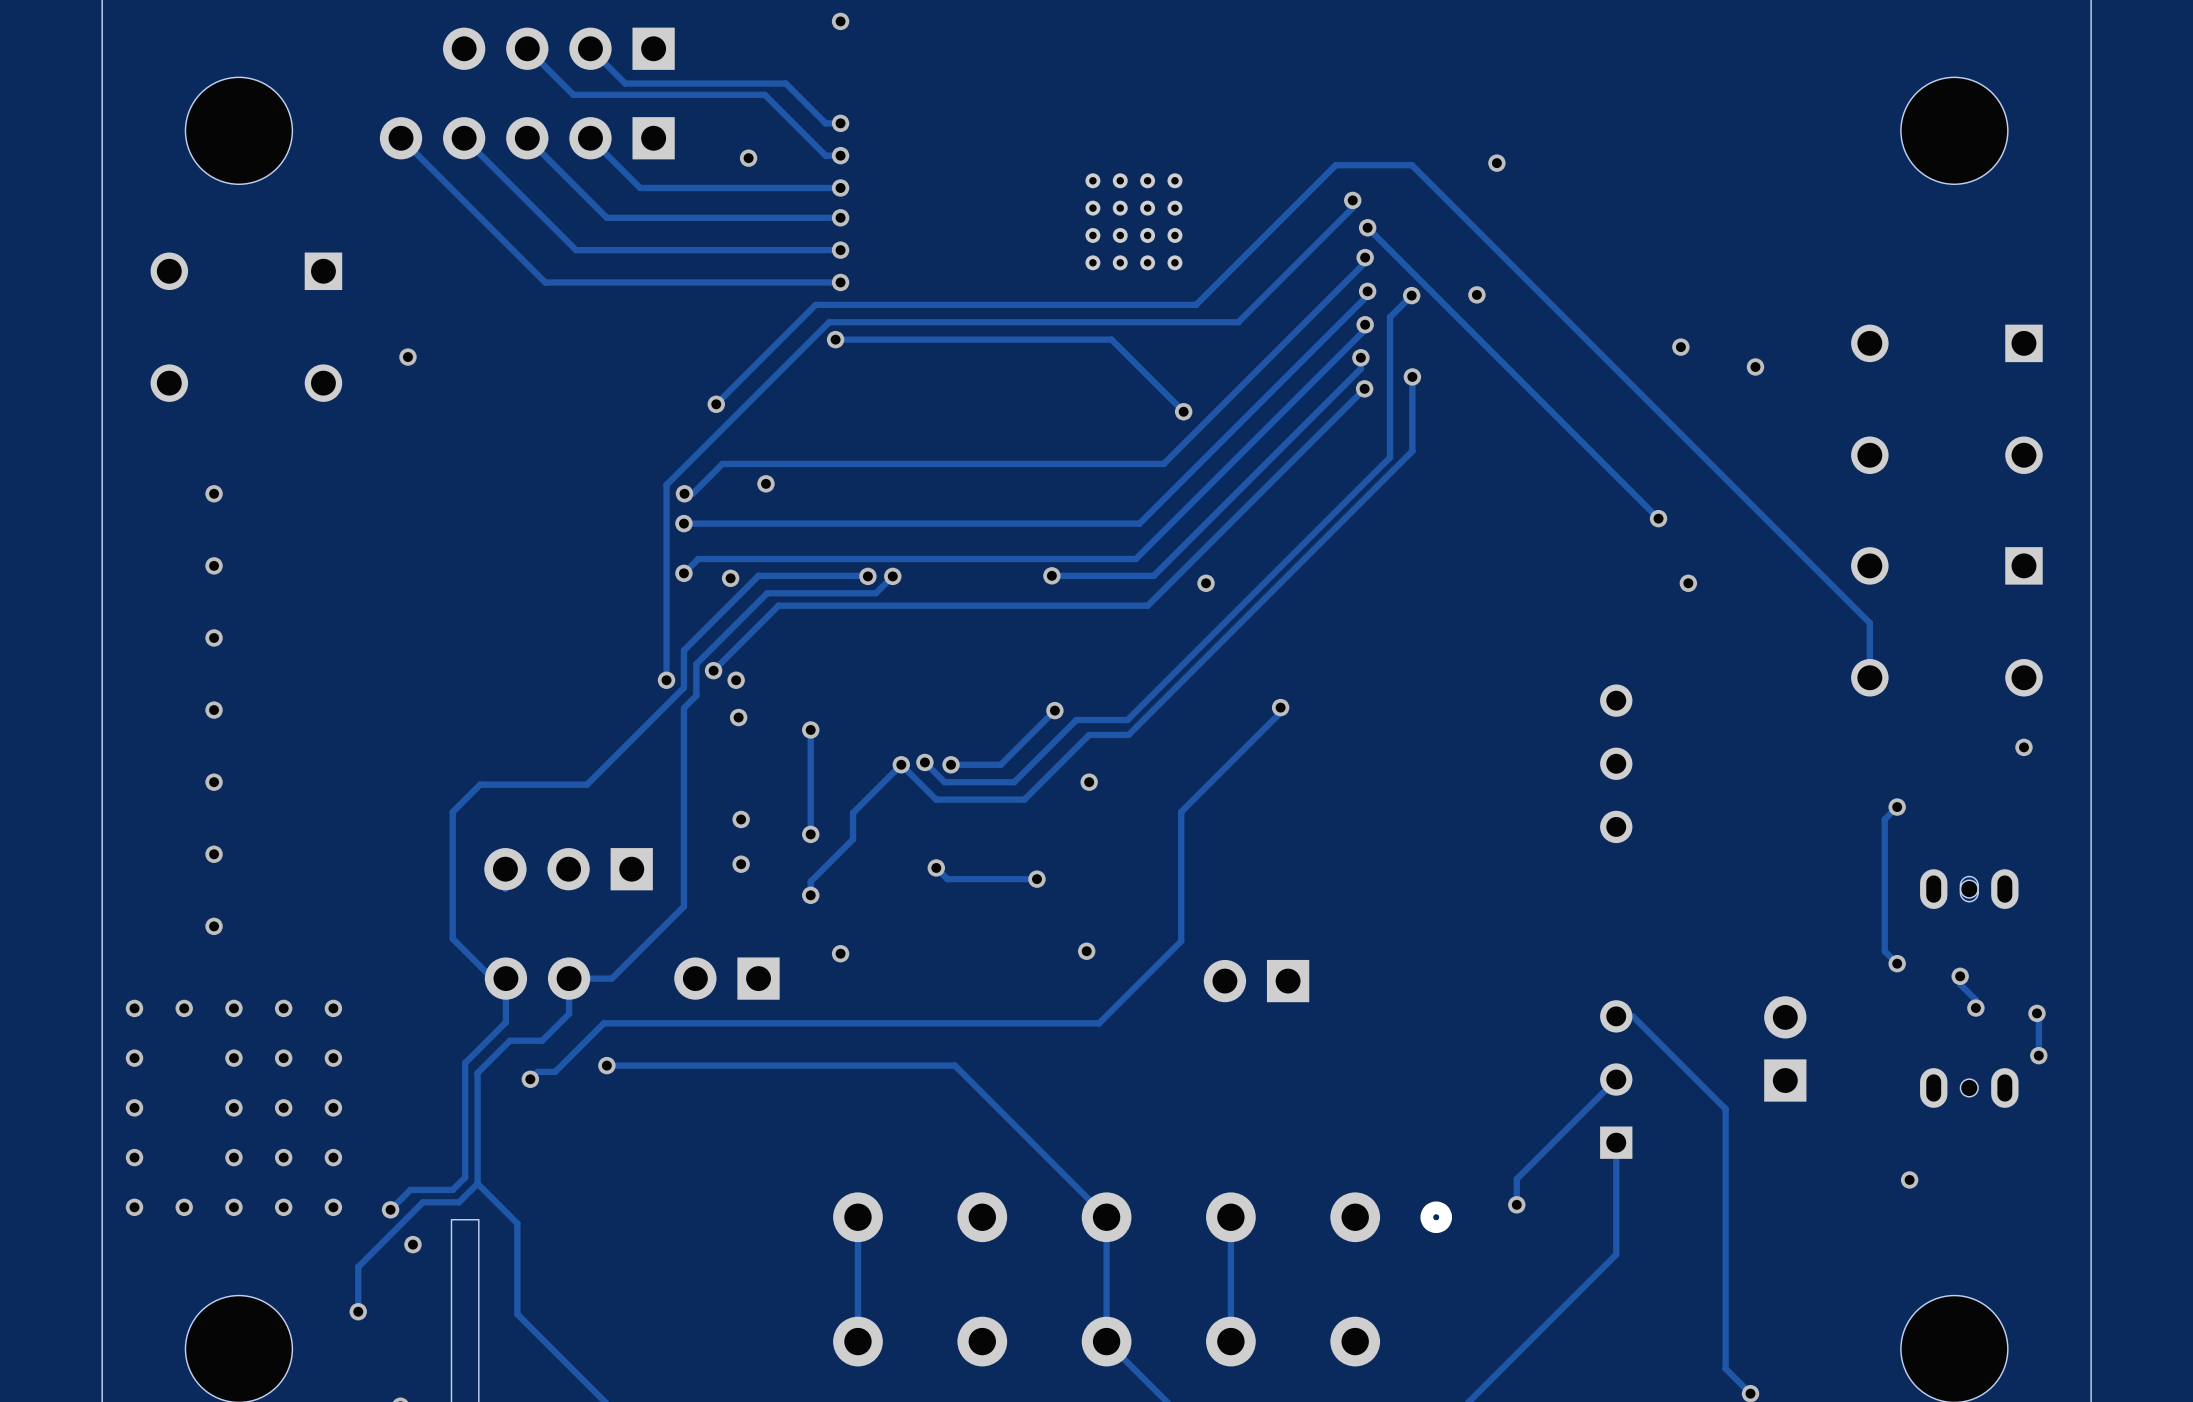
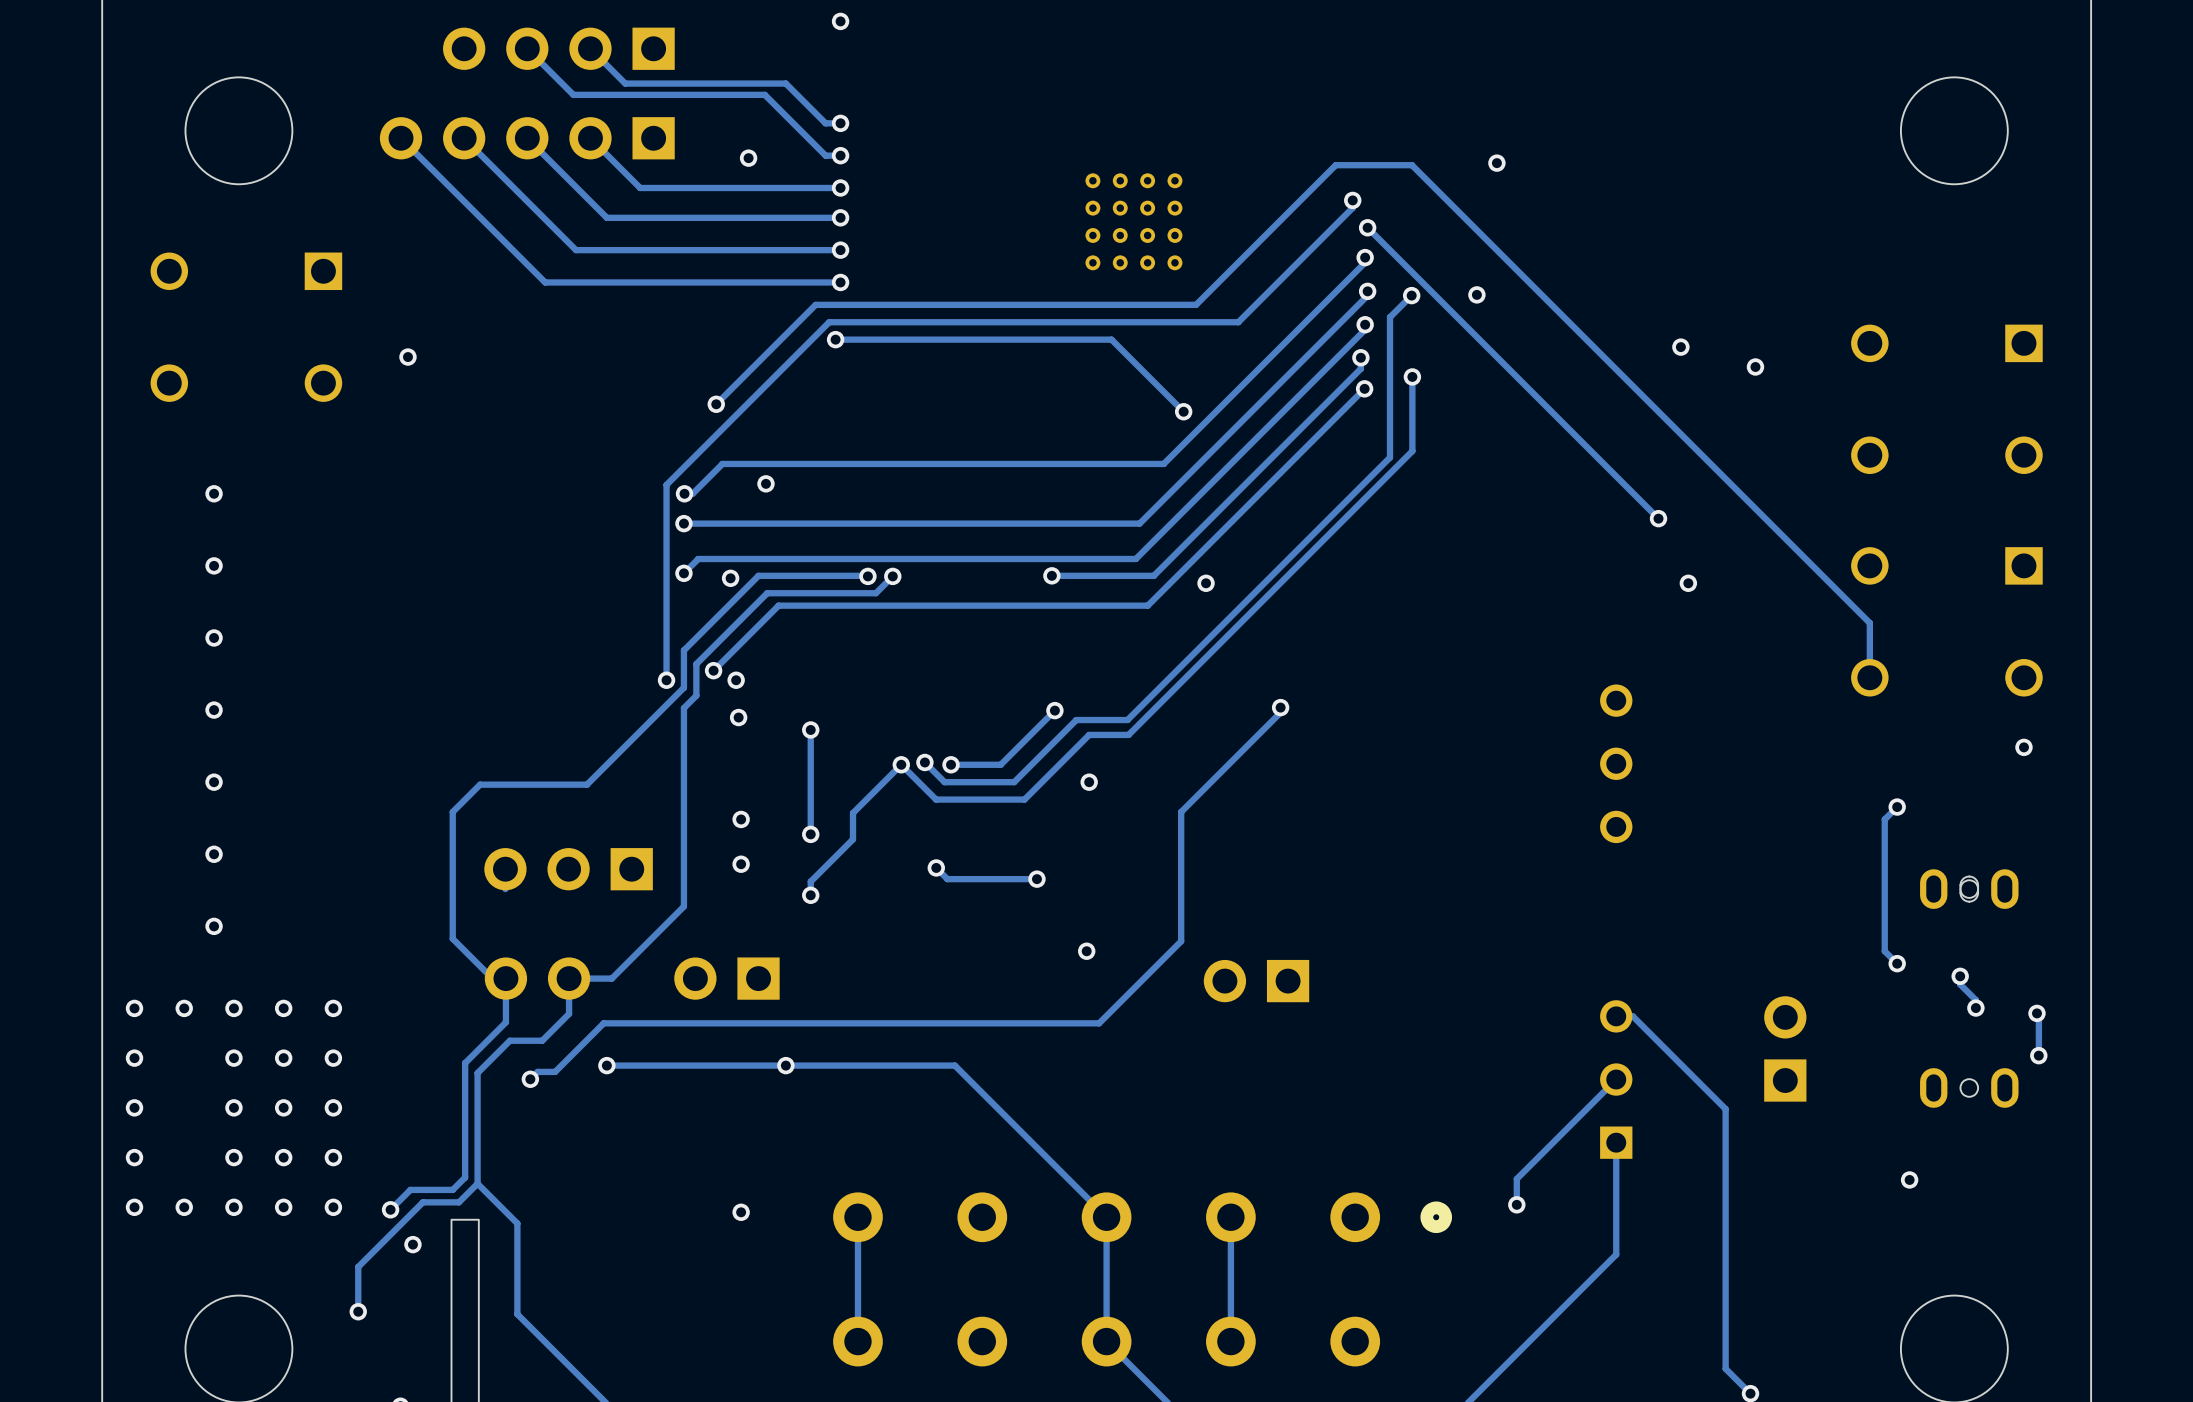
via position: (840, 953) -> (785, 1065)
via: none -> (741, 1212)

